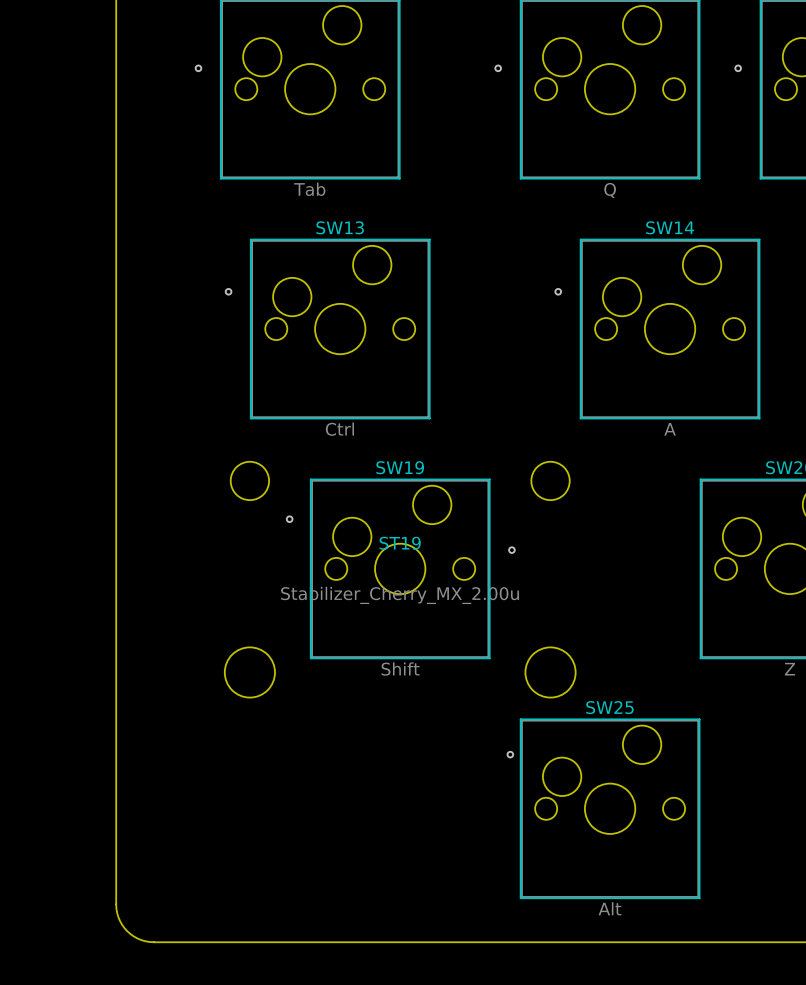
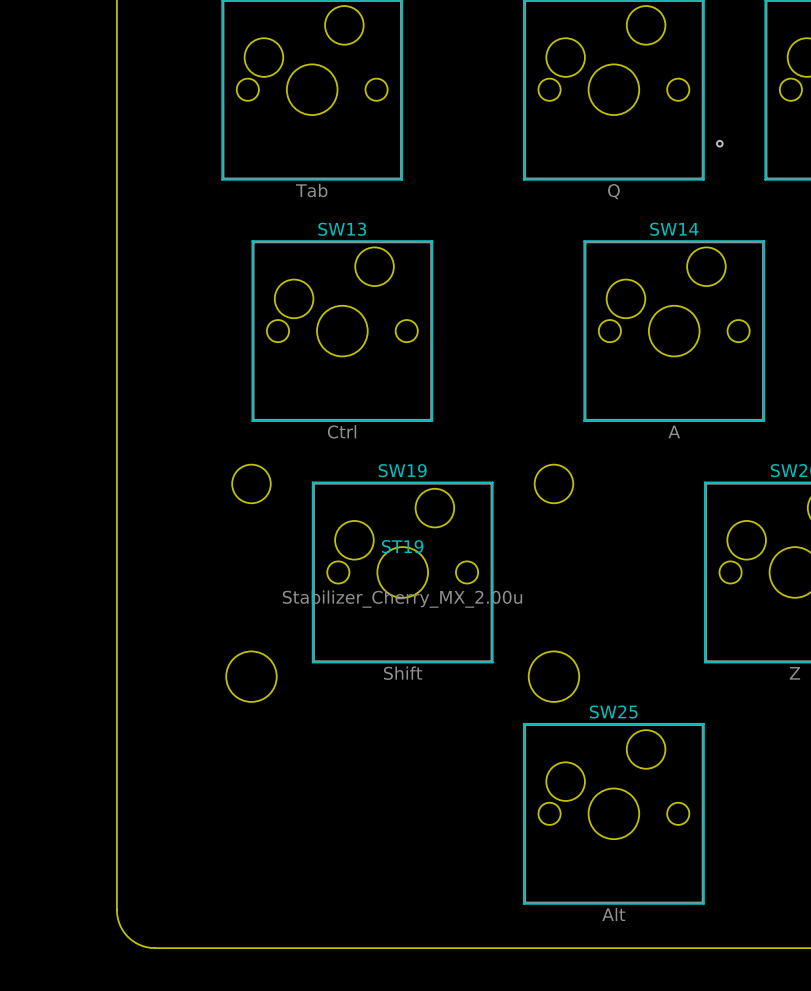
via: (198, 68) -> none
via: (498, 68) -> none
via: (738, 68) -> none
via: none -> (719, 143)
via: (228, 291) -> none
via: (558, 291) -> none
via: (289, 519) -> none
via: (511, 550) -> none
via: (510, 754) -> none

